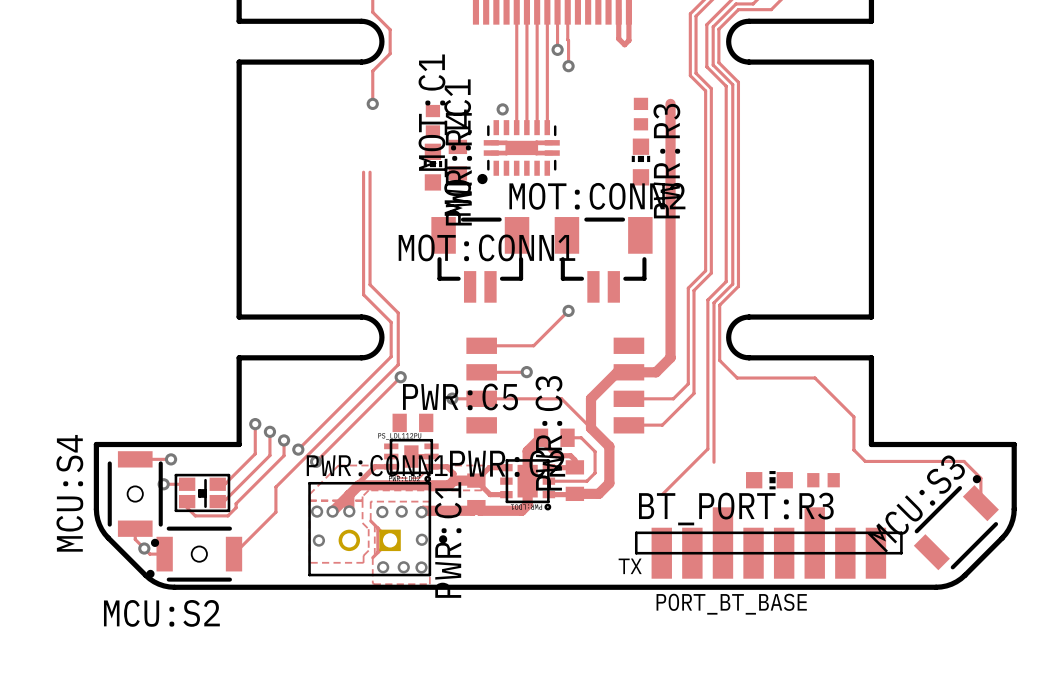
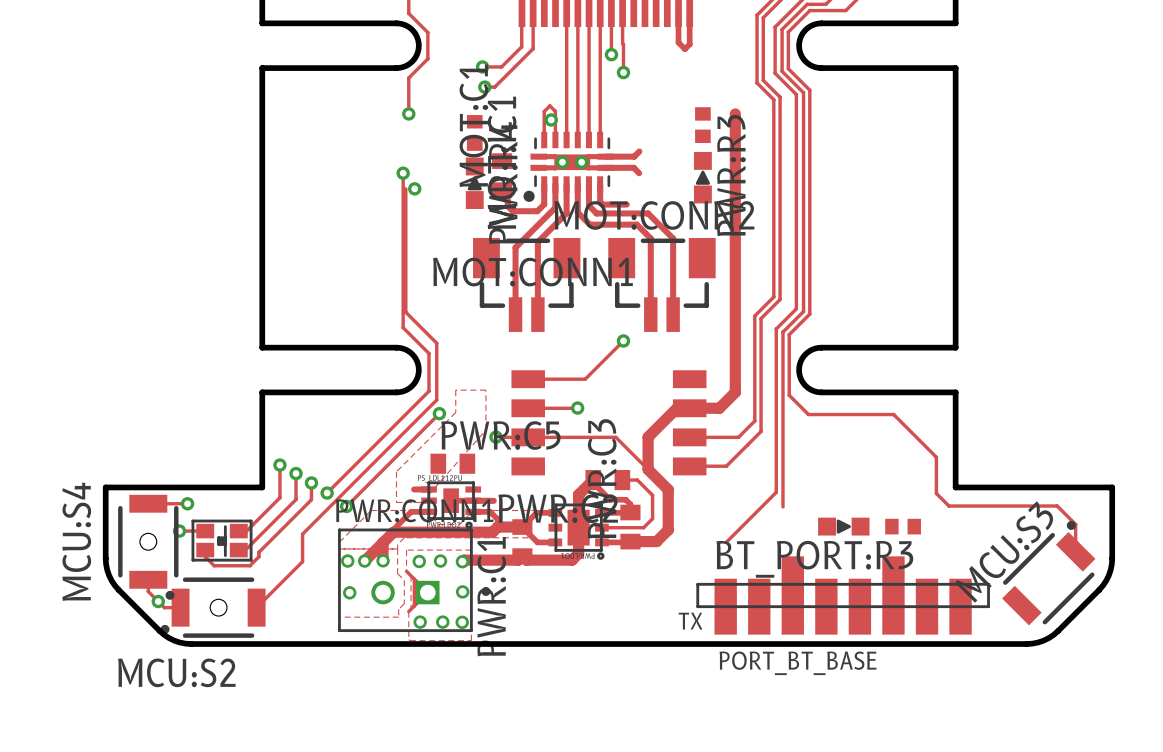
track: none -> (533, 10) (533, 48) (494, 87) (484, 87)
track: none -> (521, 11) (521, 46) (501, 66) (482, 66)
via: none -> (482, 66)
via: none -> (484, 87)
track: none -> (544, 139) (544, 111) (549, 105) (555, 111) (555, 139)
track: none -> (639, 151) (634, 156) (605, 156)
part footprint: [631, 138, 651, 186] -> [693, 151, 712, 204]
part footprint: [423, 143, 443, 191] -> [465, 157, 484, 209]
via: none -> (562, 162)
via: none -> (581, 162)
track: none -> (605, 167) (633, 167) (639, 173)
via: none -> (403, 173)
track: none -> (544, 184) (544, 204) (537, 211) (512, 211) (507, 206) (507, 192)
track: none -> (555, 184) (555, 207) (515, 247) (515, 314)
track: none -> (566, 184) (566, 213) (537, 242) (537, 314)
track: none -> (577, 184) (577, 212) (589, 224) (636, 224) (650, 238) (650, 314)
track: none -> (588, 184) (588, 205) (596, 213) (648, 213) (673, 238) (673, 314)
track: none -> (600, 184) (600, 202) (602, 204) (626, 204)
track: (363, 172) (363, 294) (367, 298) -> (403, 173) (403, 327)
via: none -> (414, 188)
zone outline: none -> (455, 390) (455, 412) (396, 471) (396, 502) (421, 502) (485, 430) (485, 390) (455, 390)
track: none -> (414, 489) (429, 489)
track: none -> (473, 500) (493, 500)
part footprint: [746, 471, 793, 490] -> [818, 517, 870, 536]

